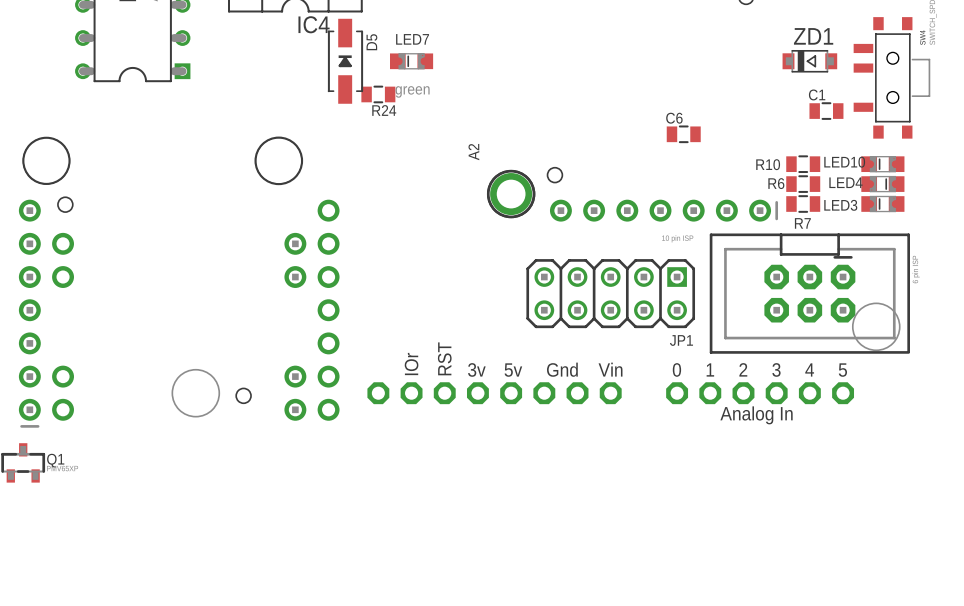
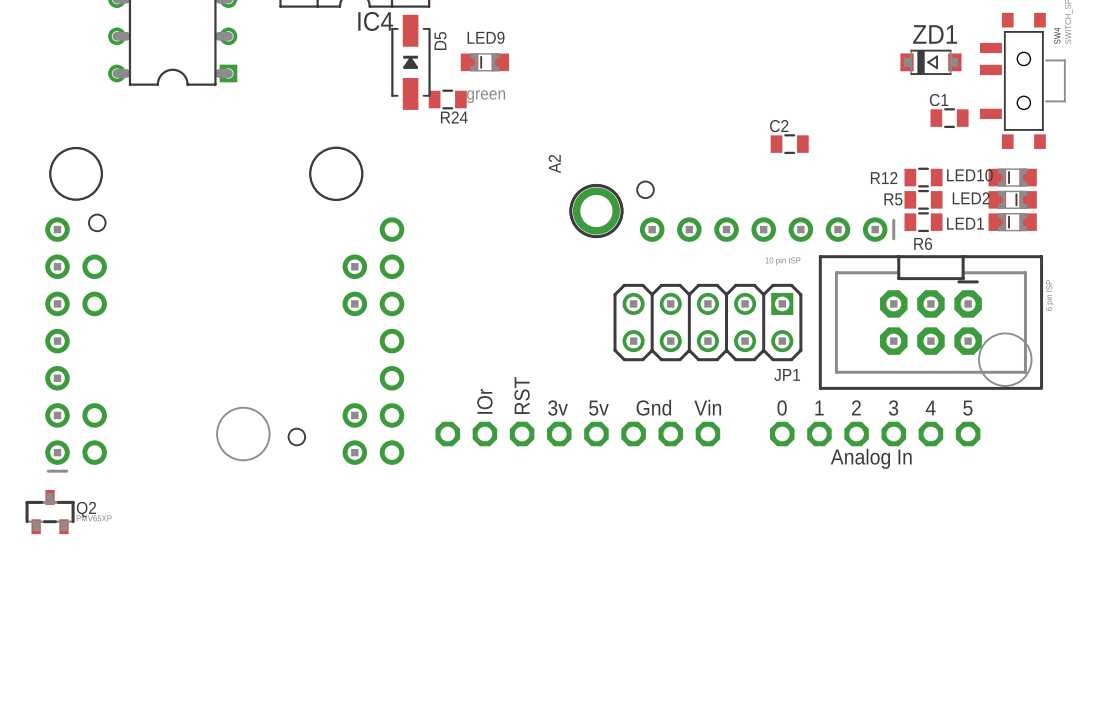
LED7 name: LED7 (412, 39) -> LED9 (486, 37)
C6 name: C6 (674, 118) -> C2 (779, 126)
R10 name: R10 (768, 164) -> R12 (884, 178)
LED4 name: LED4 (845, 182) -> LED2 (971, 198)
R6 name: R6 (776, 183) -> R5 (893, 199)
LED3 name: LED3 (840, 205) -> LED1 (965, 223)
R7 name: R7 (802, 223) -> R6 (923, 243)
Q1 name: Q1 (55, 460) -> Q2 (86, 509)

